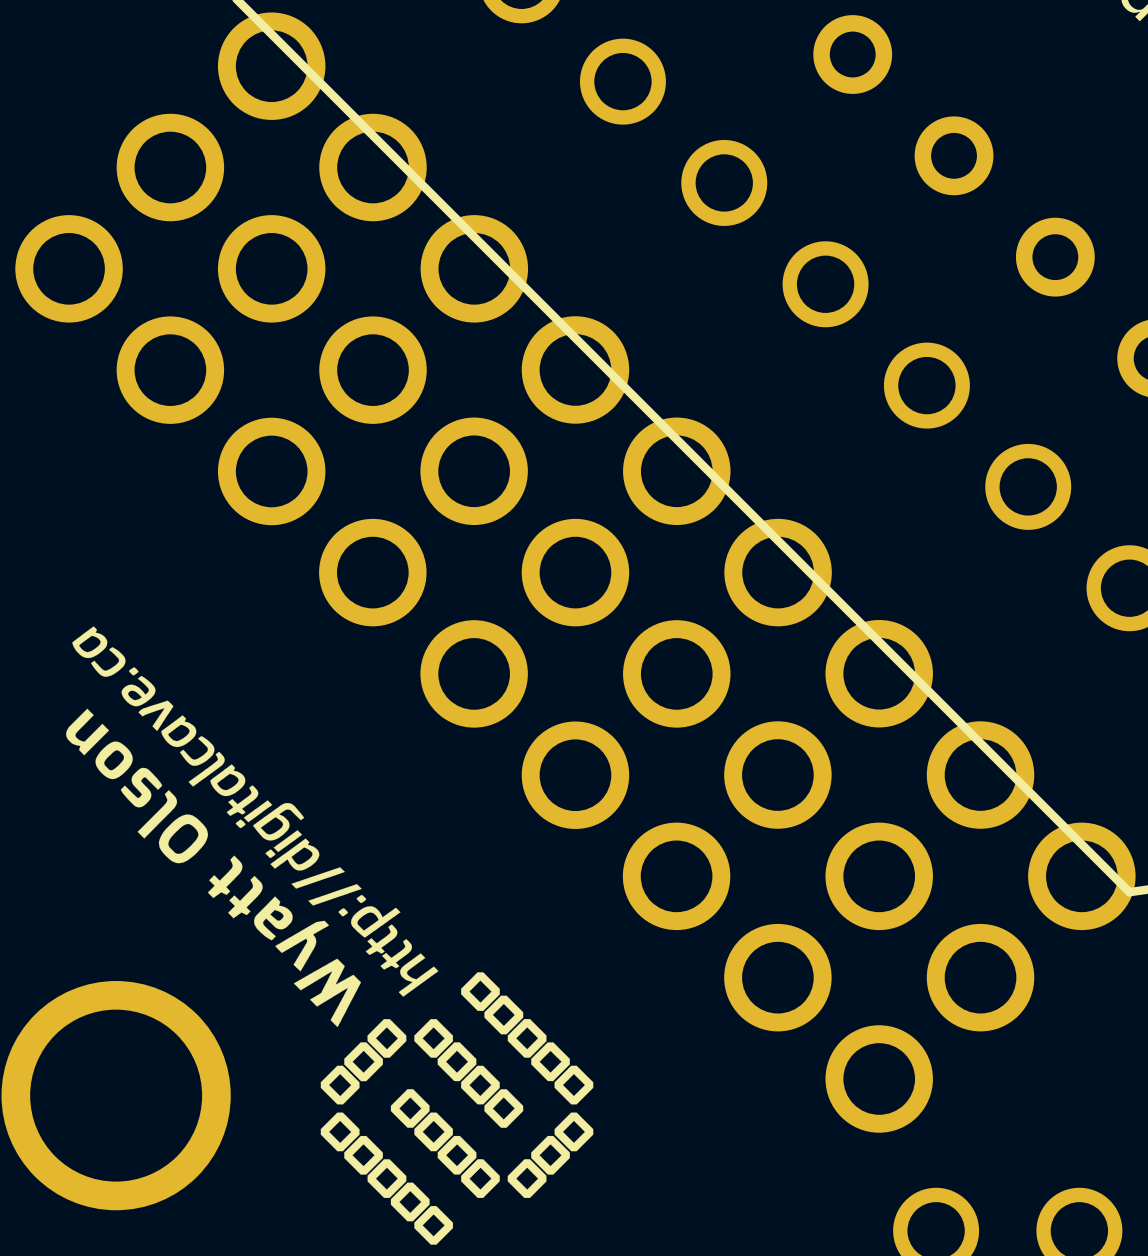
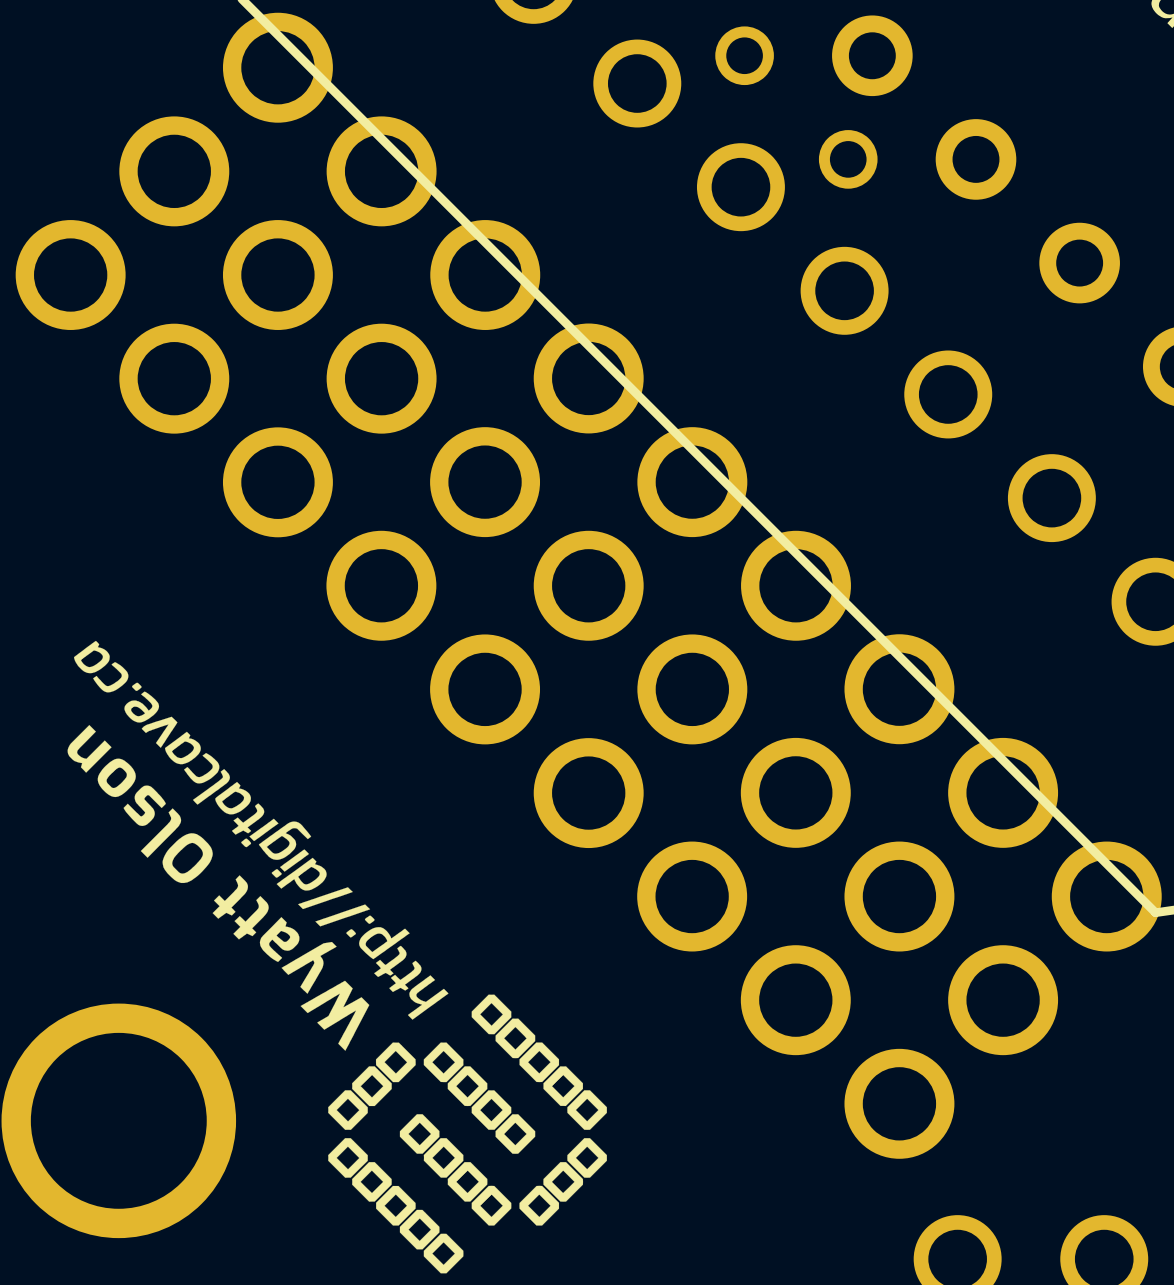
part: none -> (796, 107)

